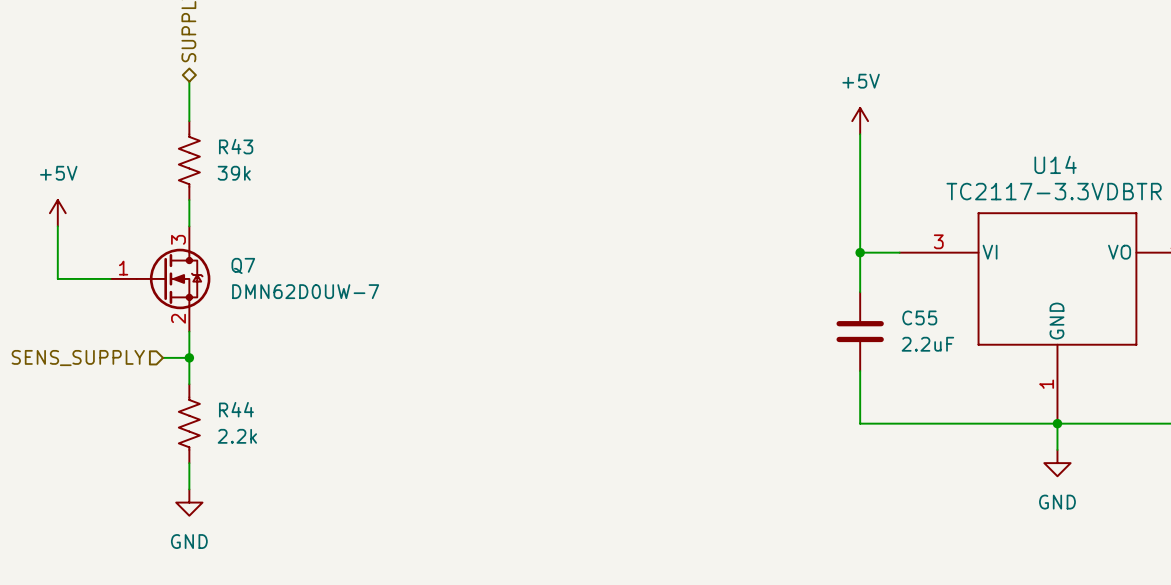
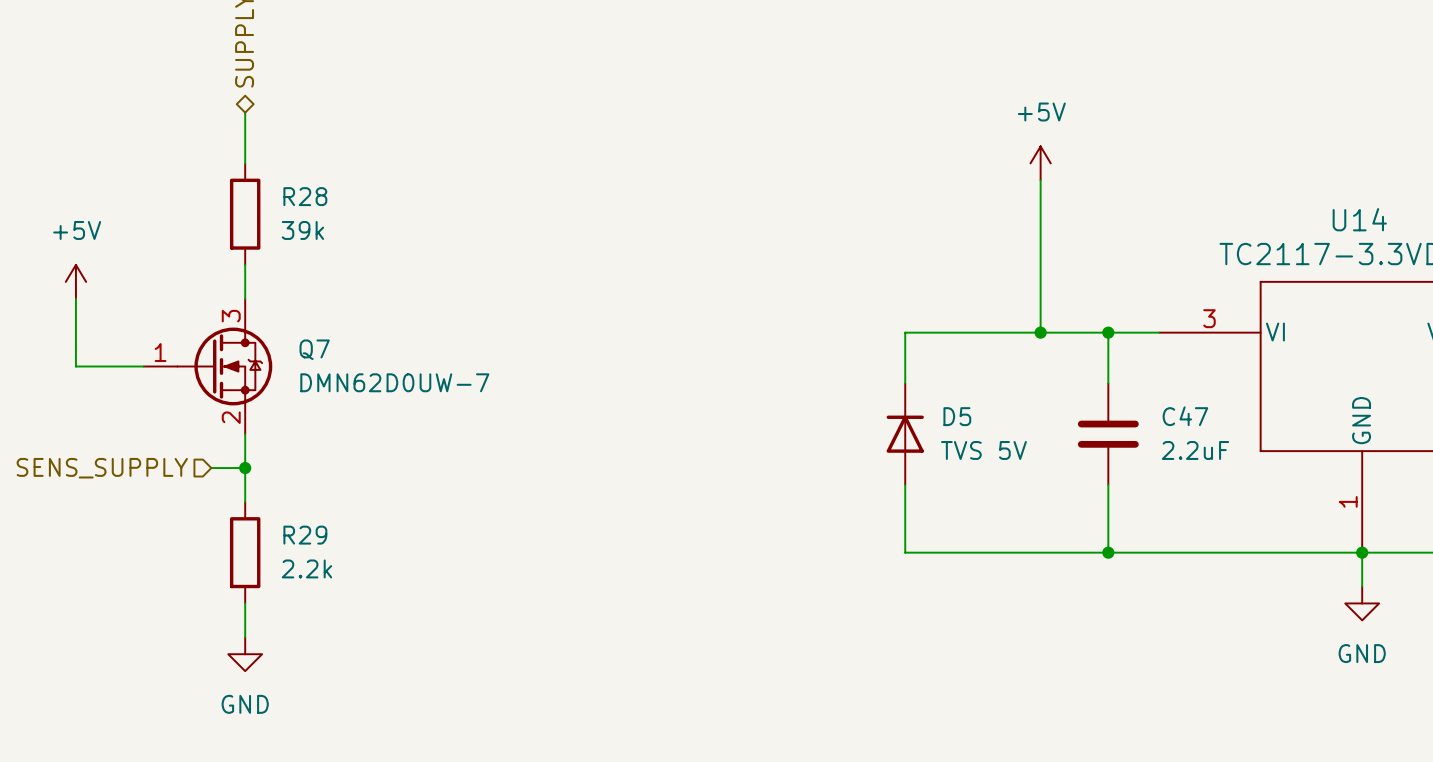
power symbol position: +5V (860, 121) -> +5V (1040, 163)
wire: none -> (1040, 180) (1040, 332)
wire: (860, 134) (860, 252) -> (905, 383) (905, 332) (1108, 332)
R43: 39k (189, 160) -> none
R28: none -> 39k (245, 214)
junction: none -> (1040, 332)
C55 name: C55 (919, 317) -> C47 (1185, 416)
D5: none -> TVS 5V (905, 434)
wire: none -> (905, 484) (905, 552) (1108, 552)
R44: 2.2k (189, 423) -> none
R29: none -> 2.2k (245, 552)
junction: none -> (1108, 552)

